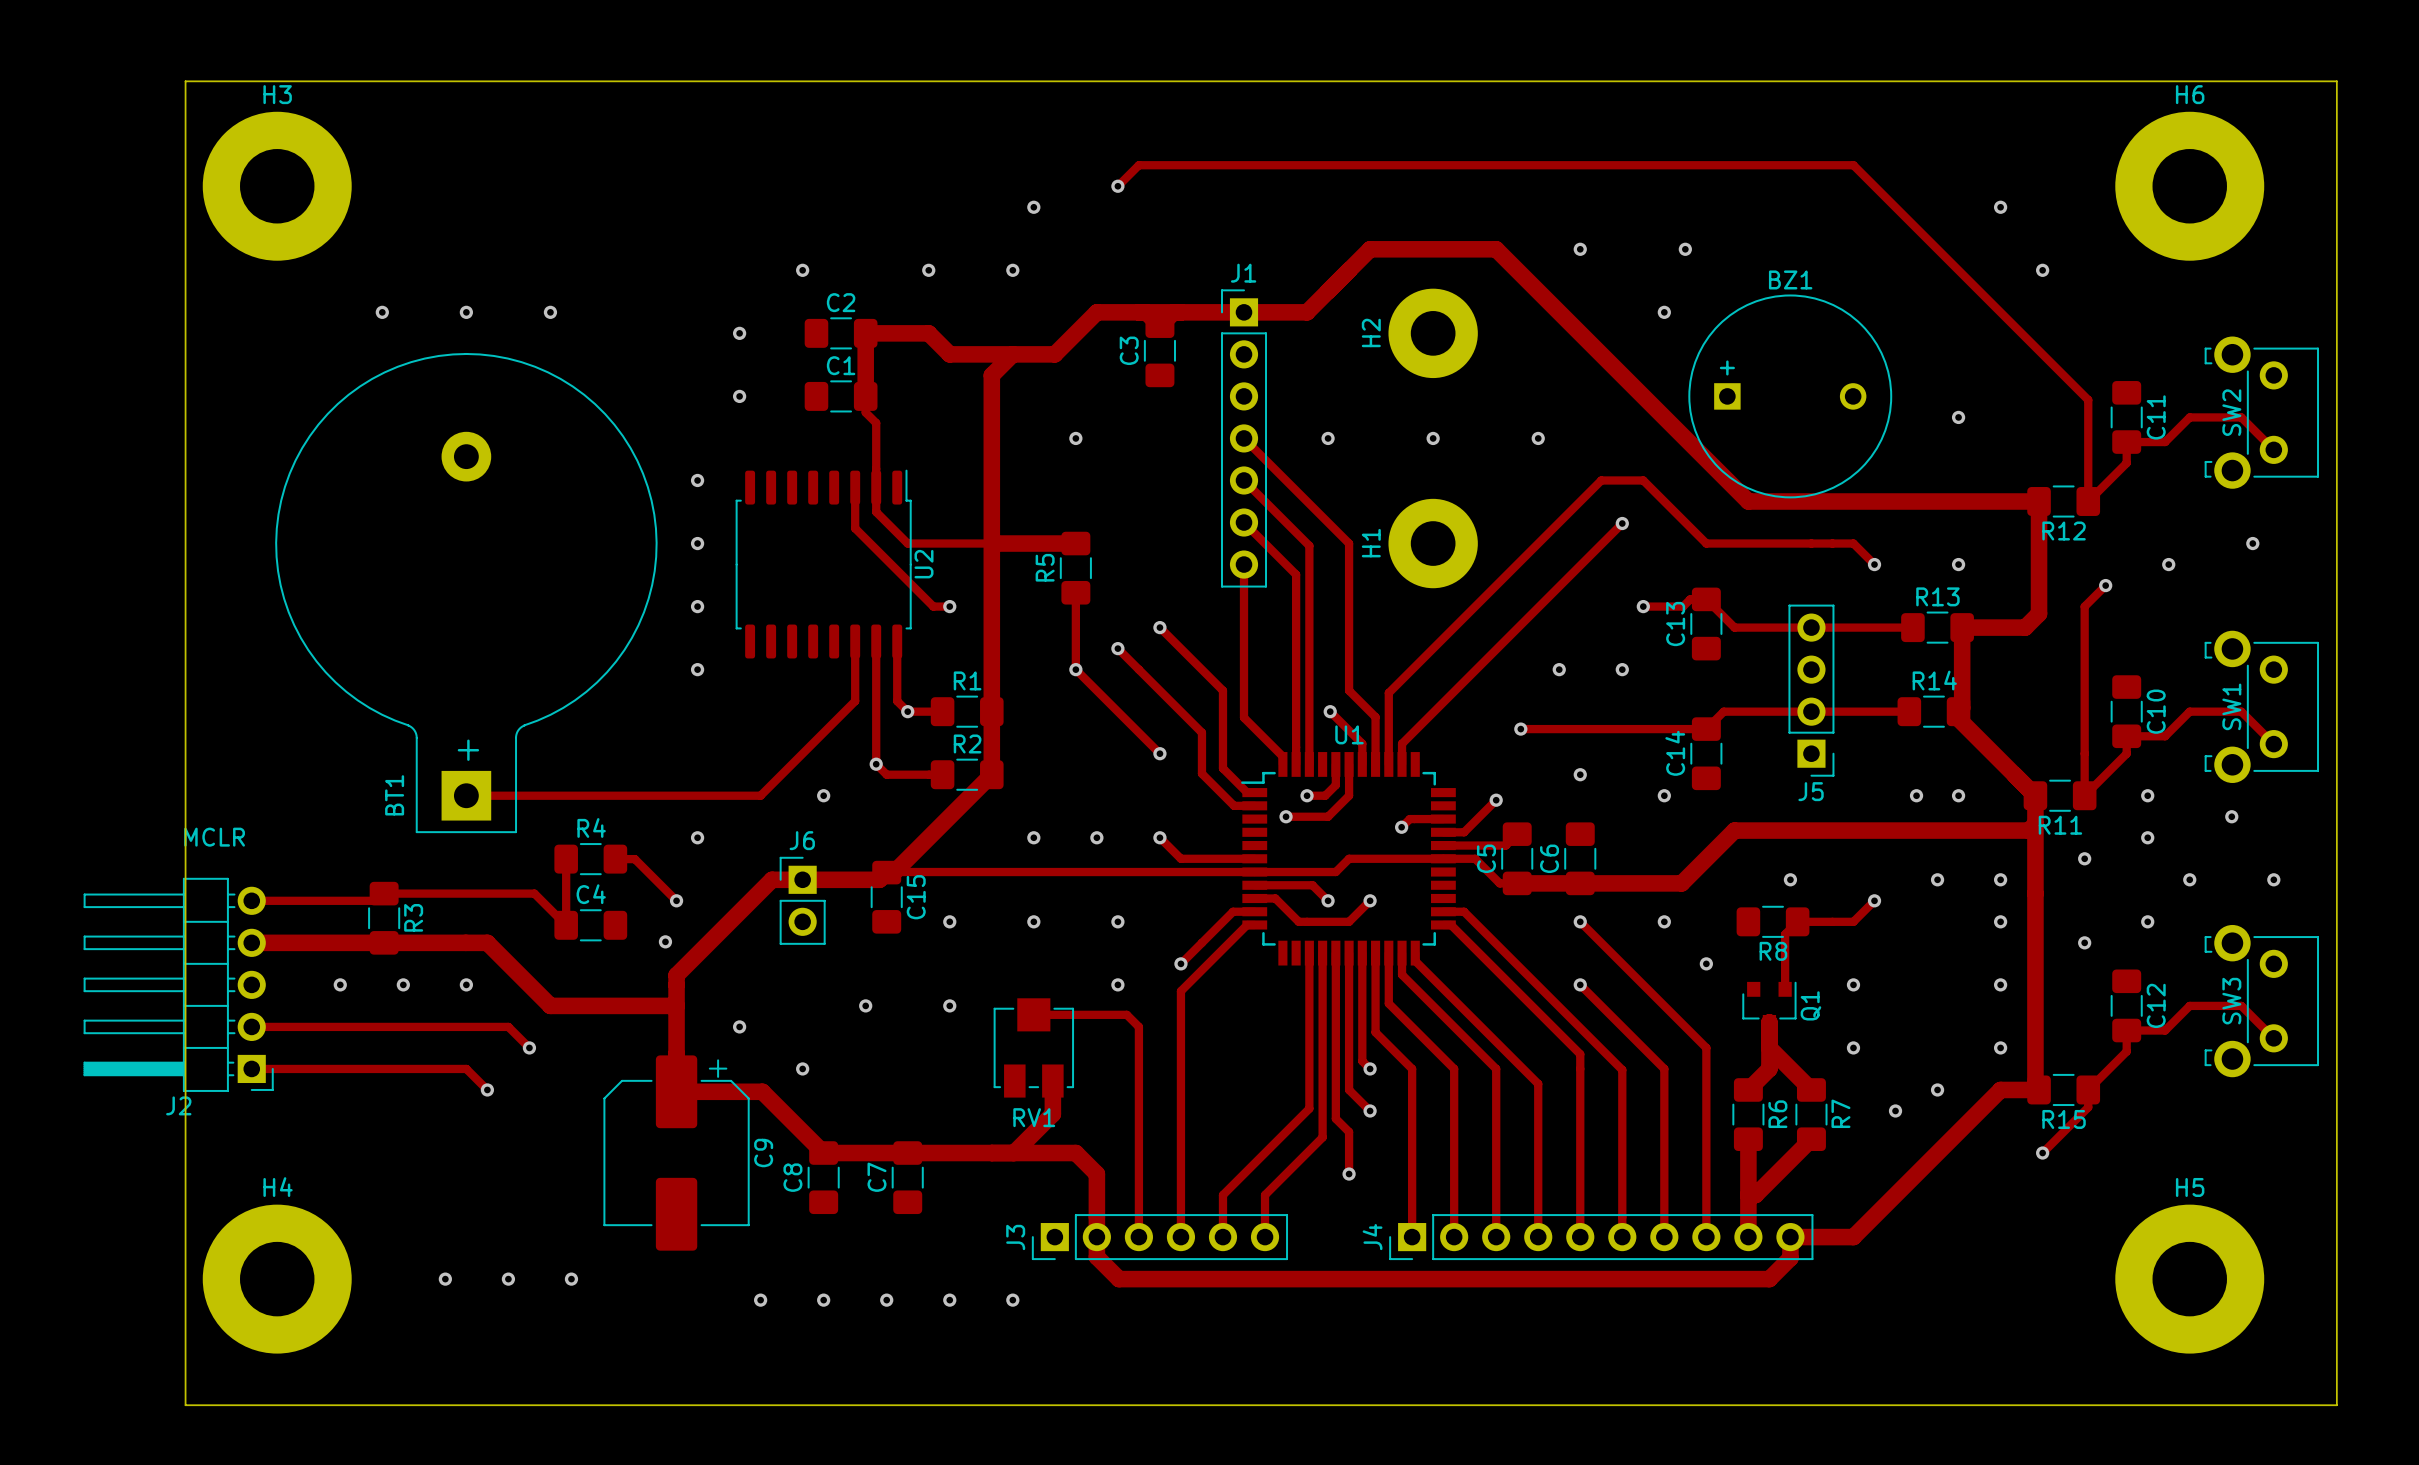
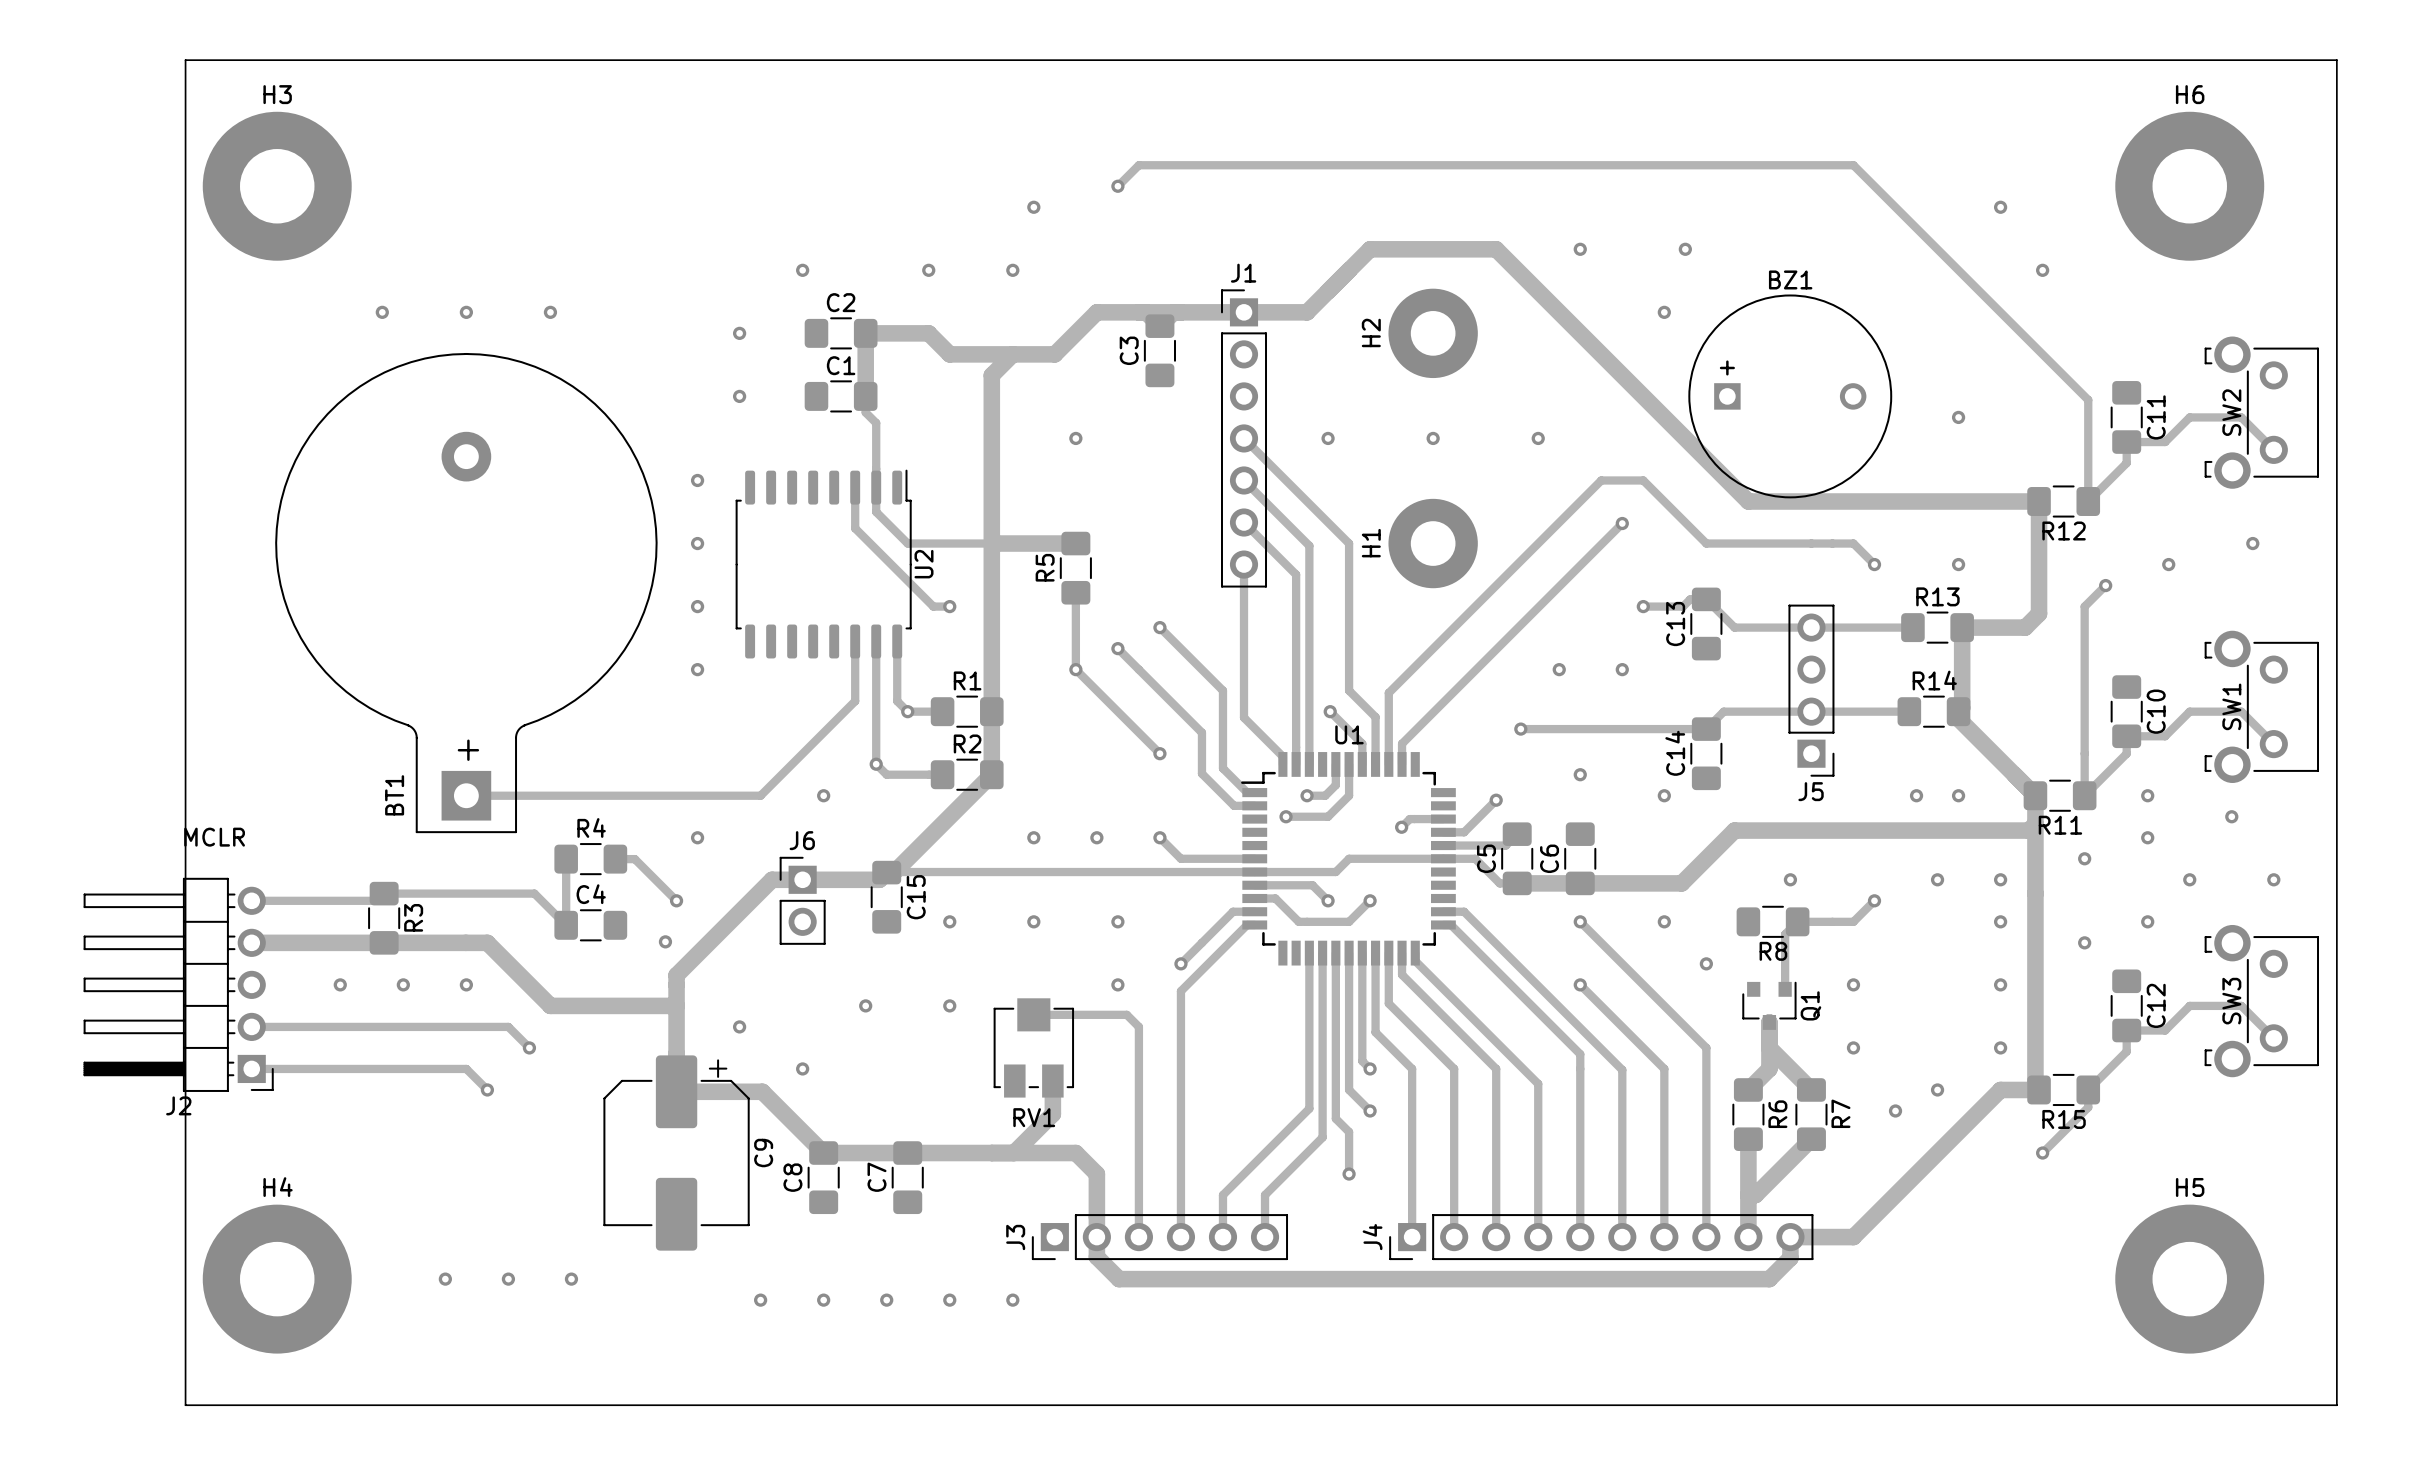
board edge: (185, 81) (2336, 81) -> (185, 81) (185, 60) (2336, 60) (2336, 81)

